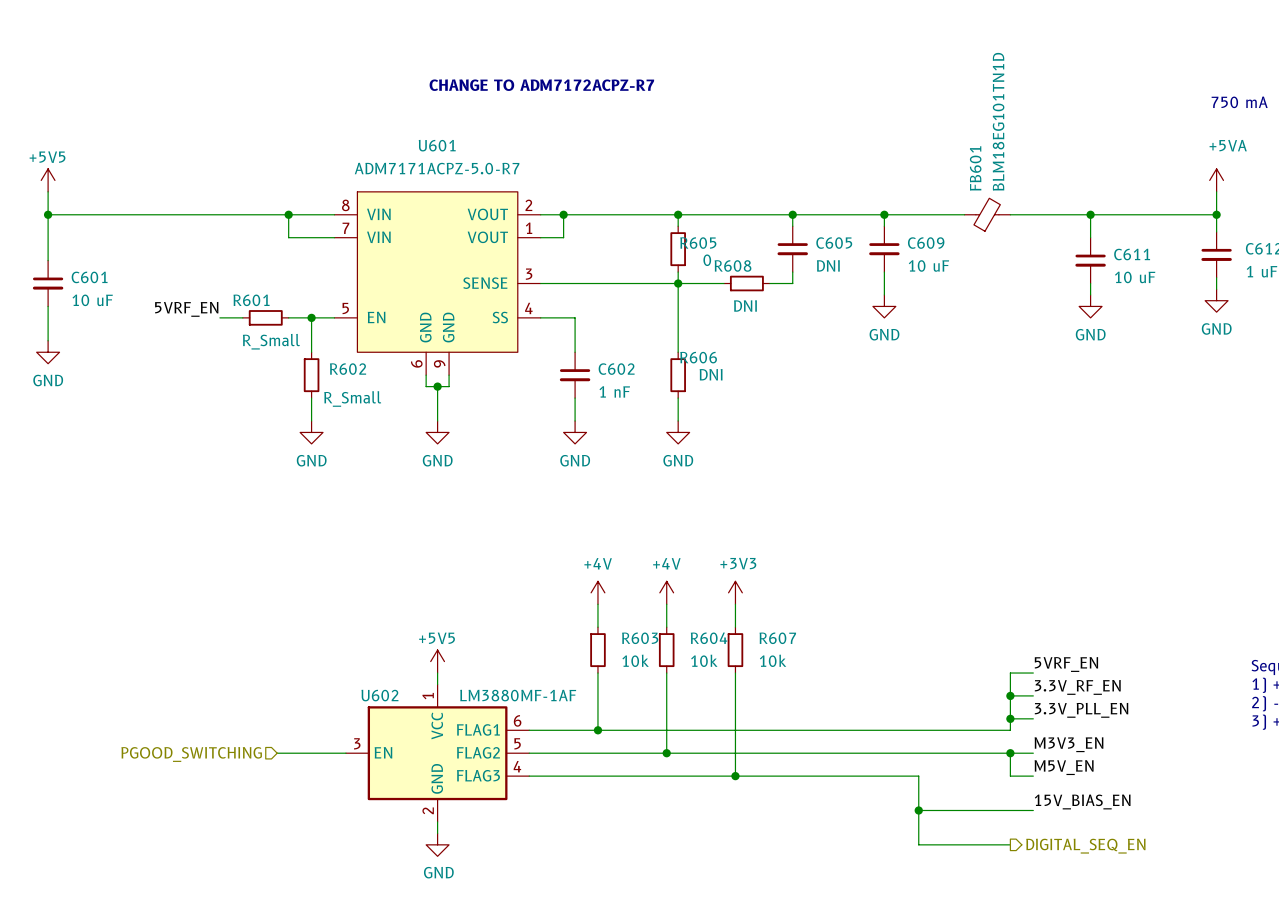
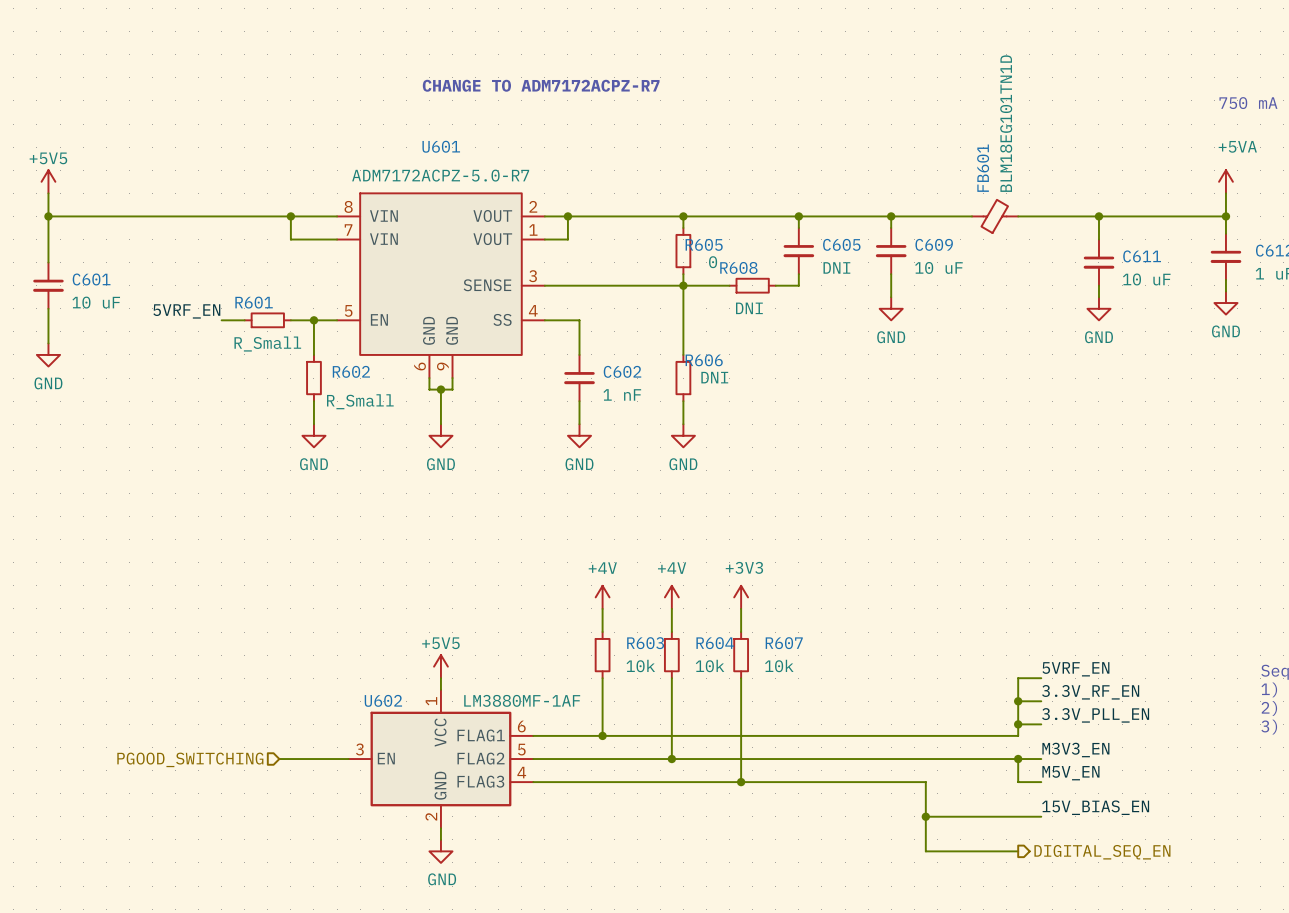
U601 value: ADM7171ACPZ-5.0-R7 (437, 168) -> ADM7172ACPZ-5.0-R7 (440, 175)

